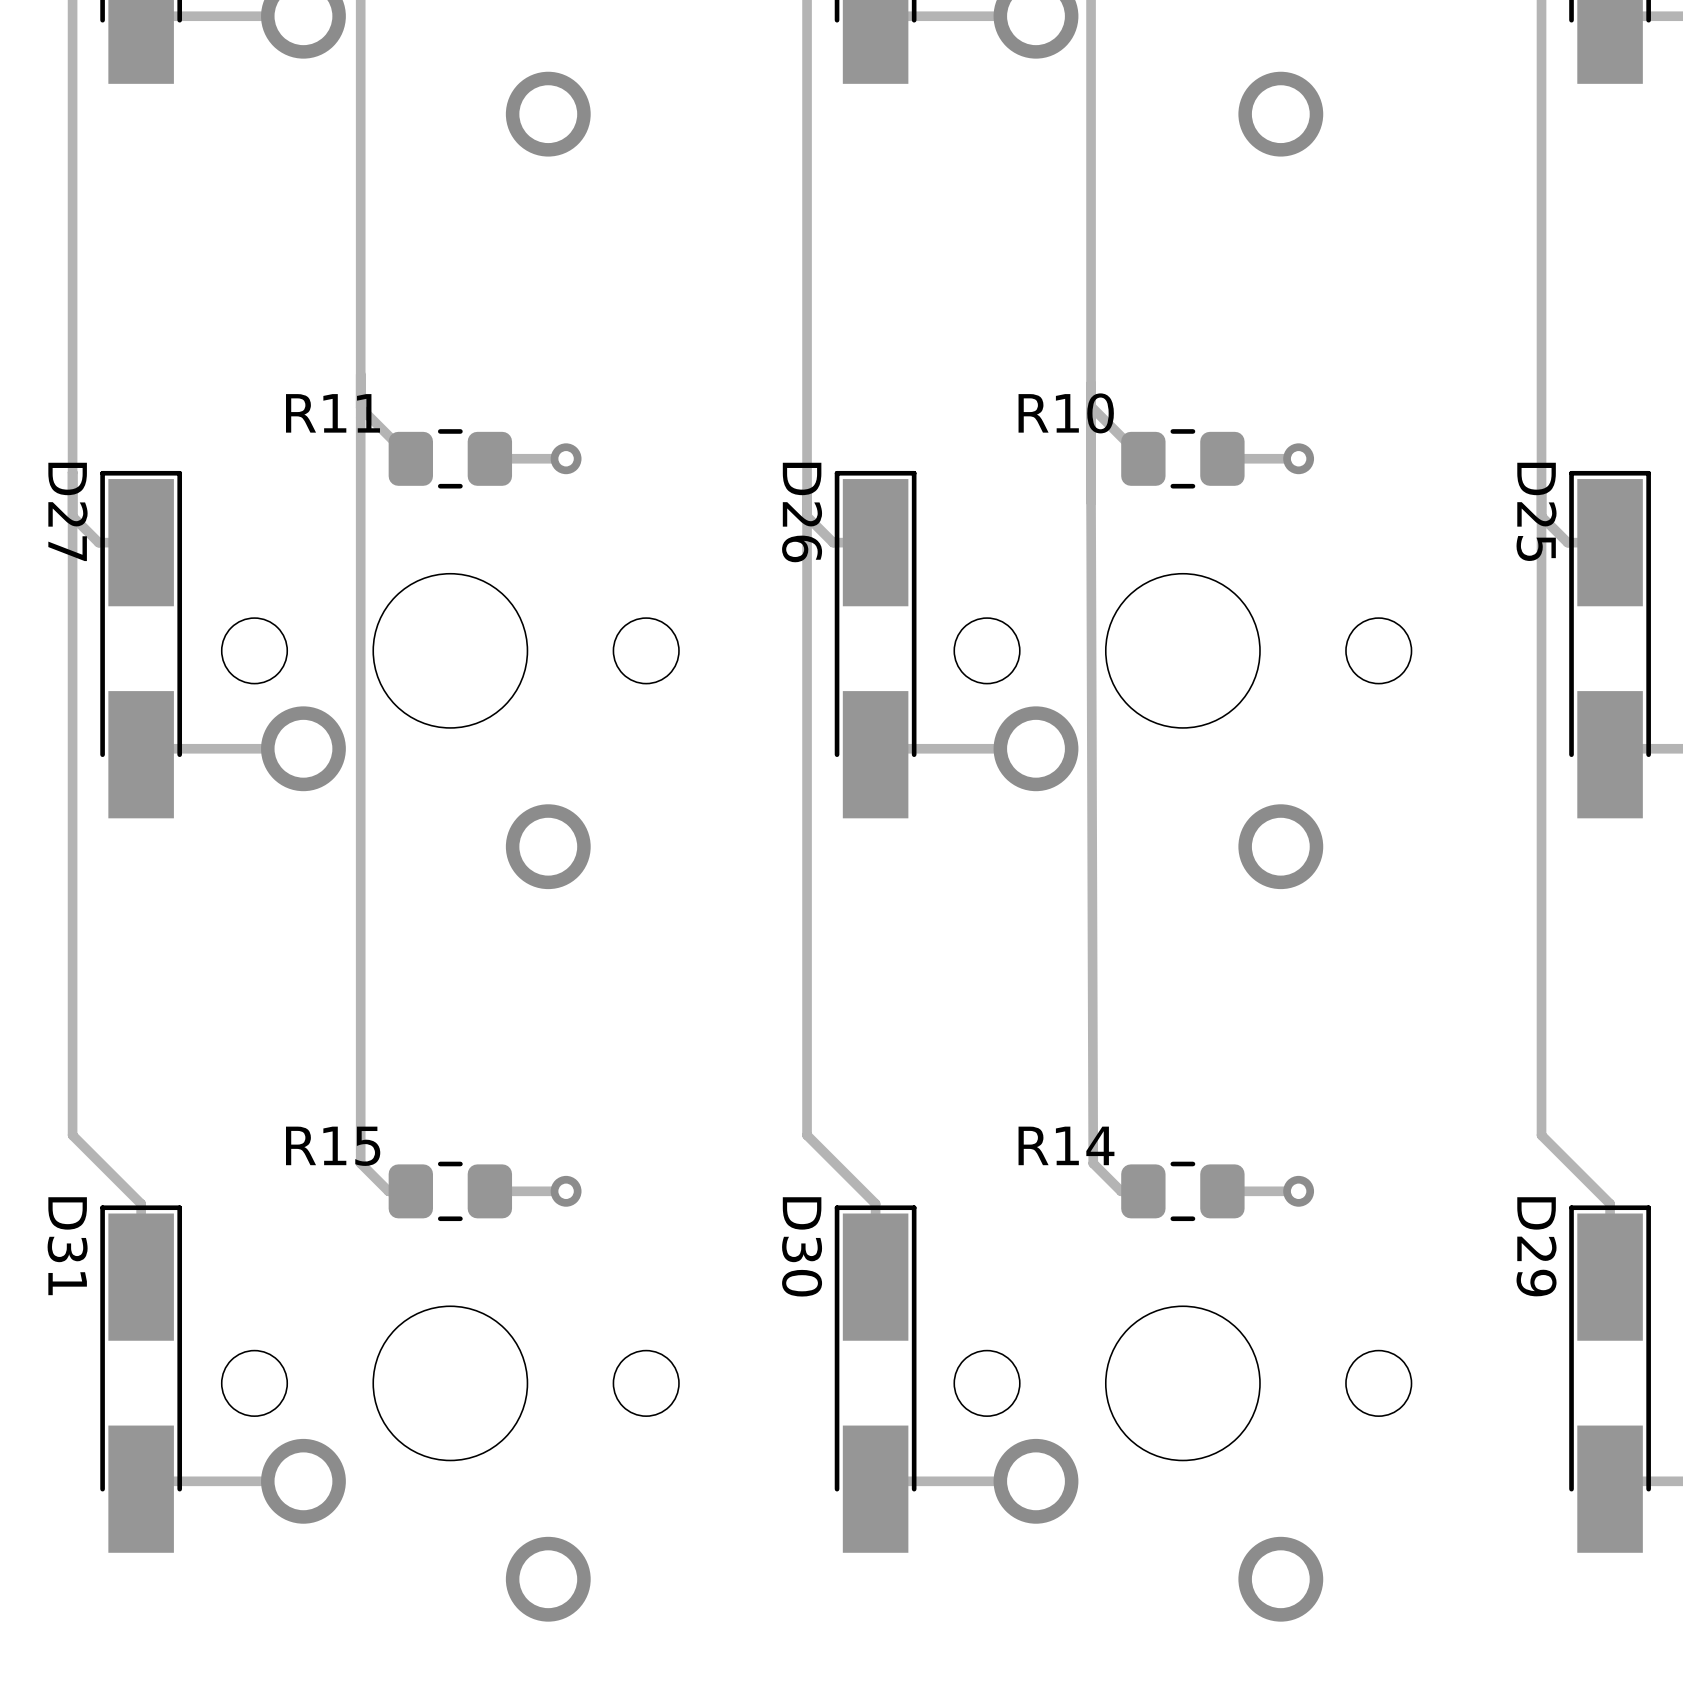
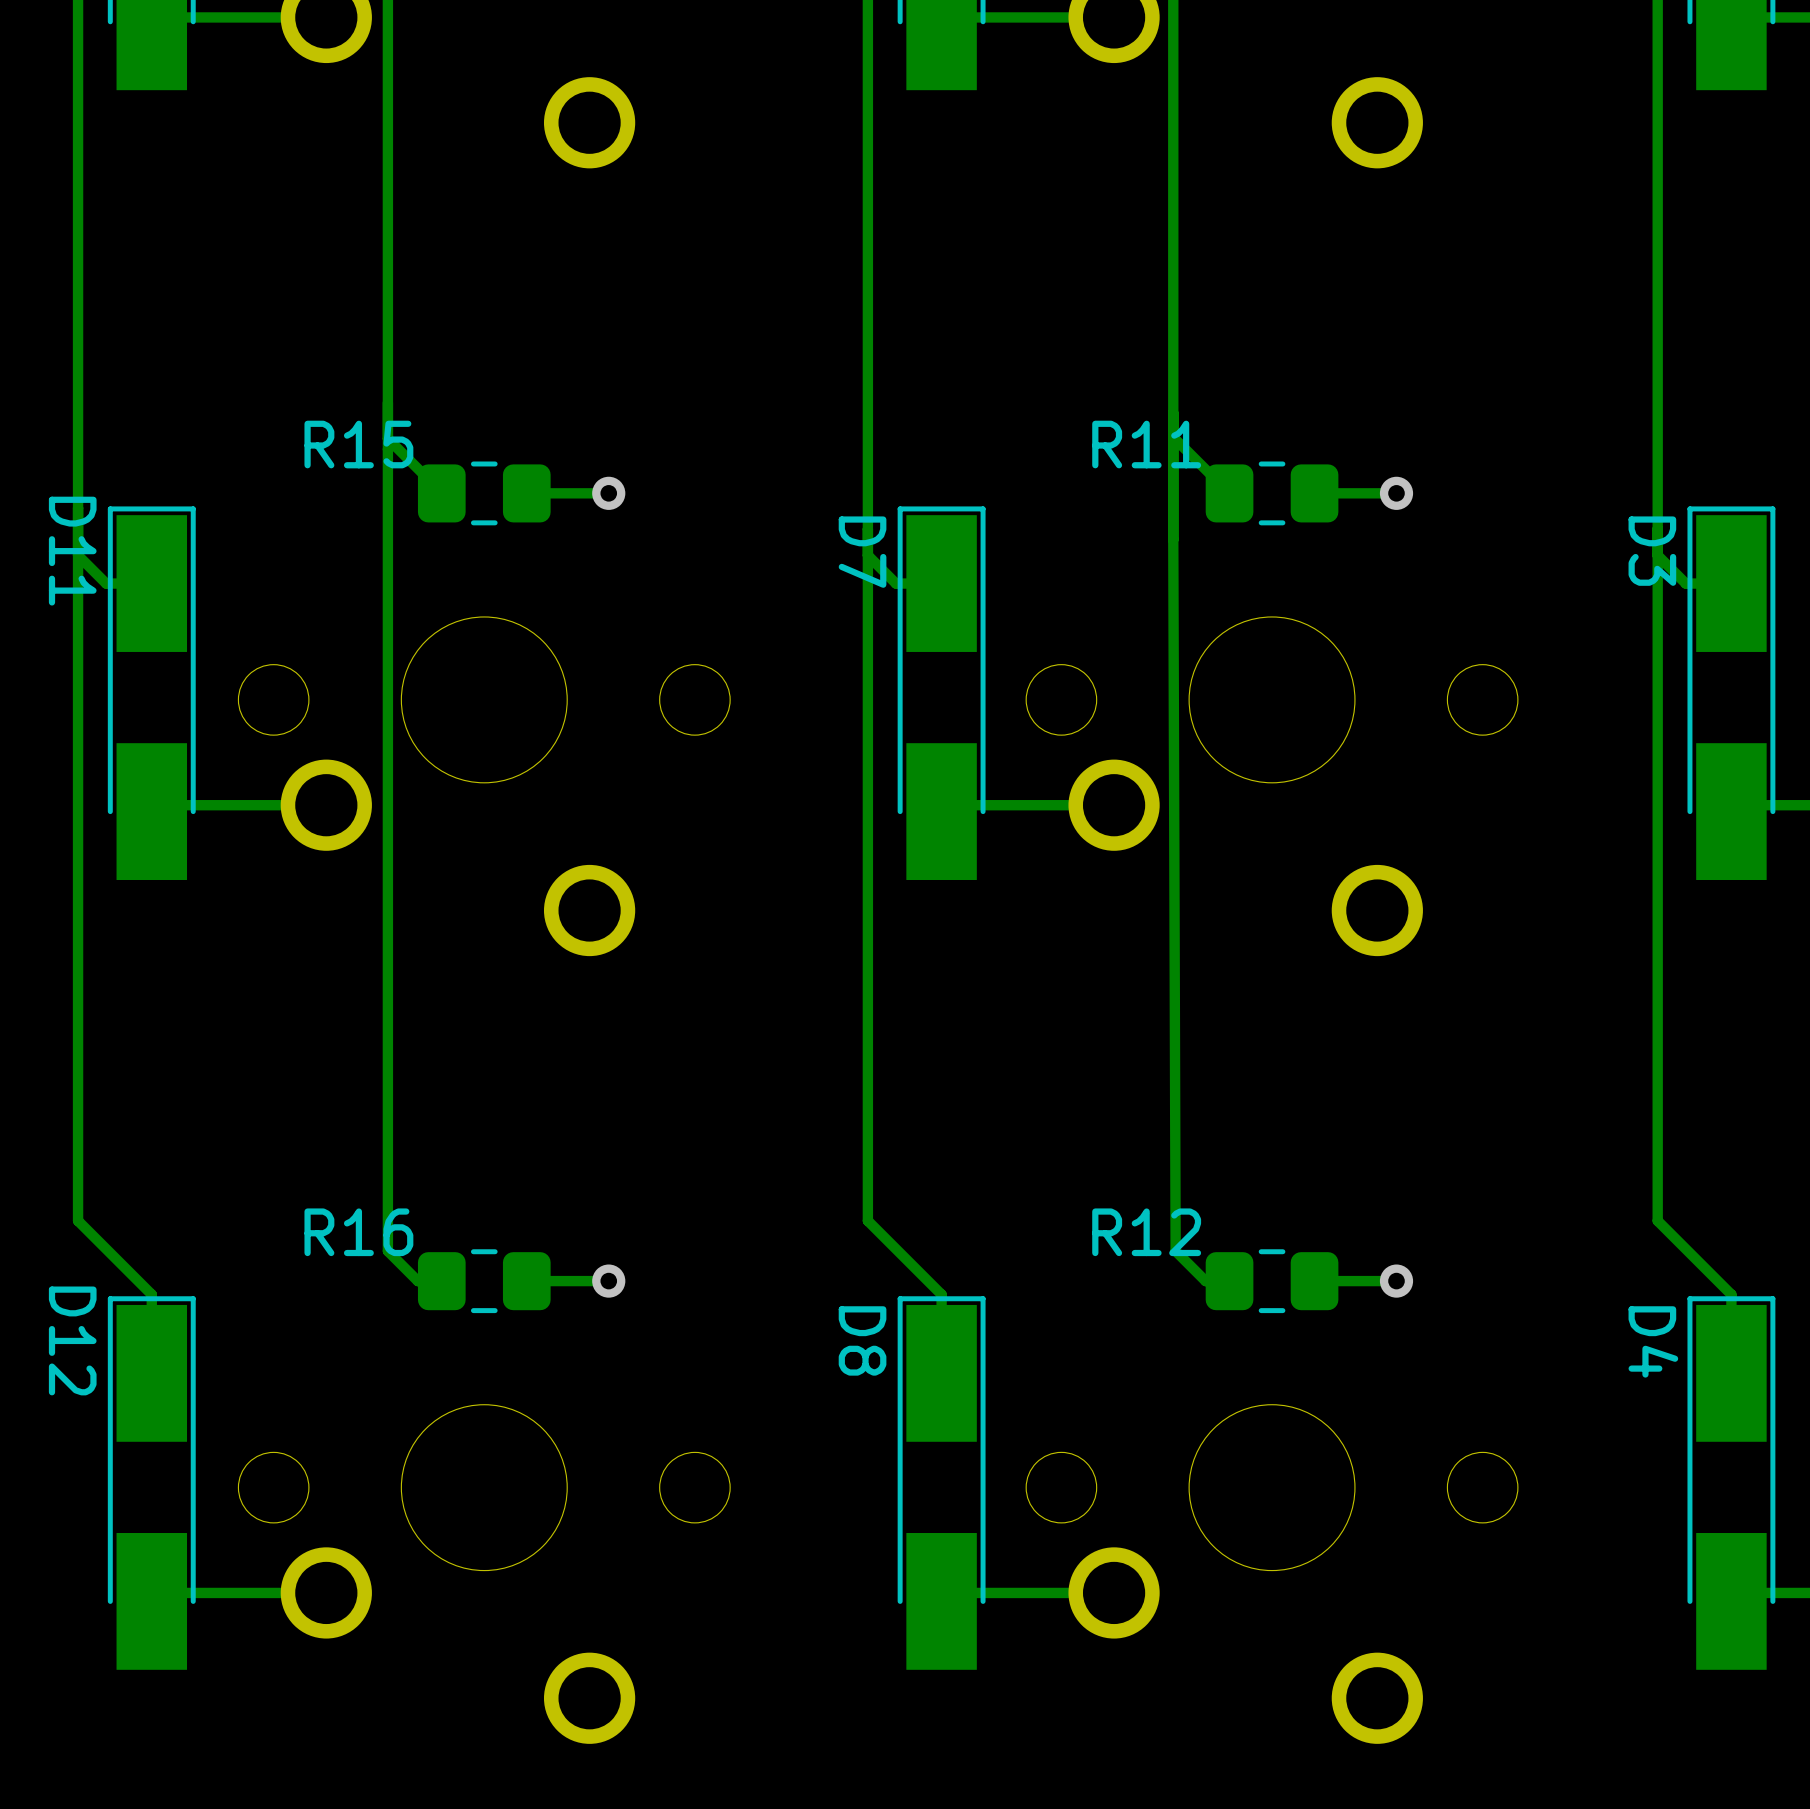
R11 name: R11 (332, 413) -> R15 (358, 444)
R10 name: R10 (1066, 413) -> R11 (1146, 444)
D27 name: D27 (67, 511) -> D11 (72, 551)
D25 name: D25 (1536, 511) -> D3 (1652, 551)
D26 name: D26 (802, 512) -> D7 (862, 552)
R14 name: R14 (1066, 1145) -> R12 (1146, 1232)
R15 name: R15 (333, 1146) -> R16 (358, 1232)
D31 name: D31 (67, 1246) -> D12 (72, 1340)
D30 name: D30 (802, 1246) -> D8 (862, 1340)
D29 name: D29 (1536, 1246) -> D4 (1653, 1341)

